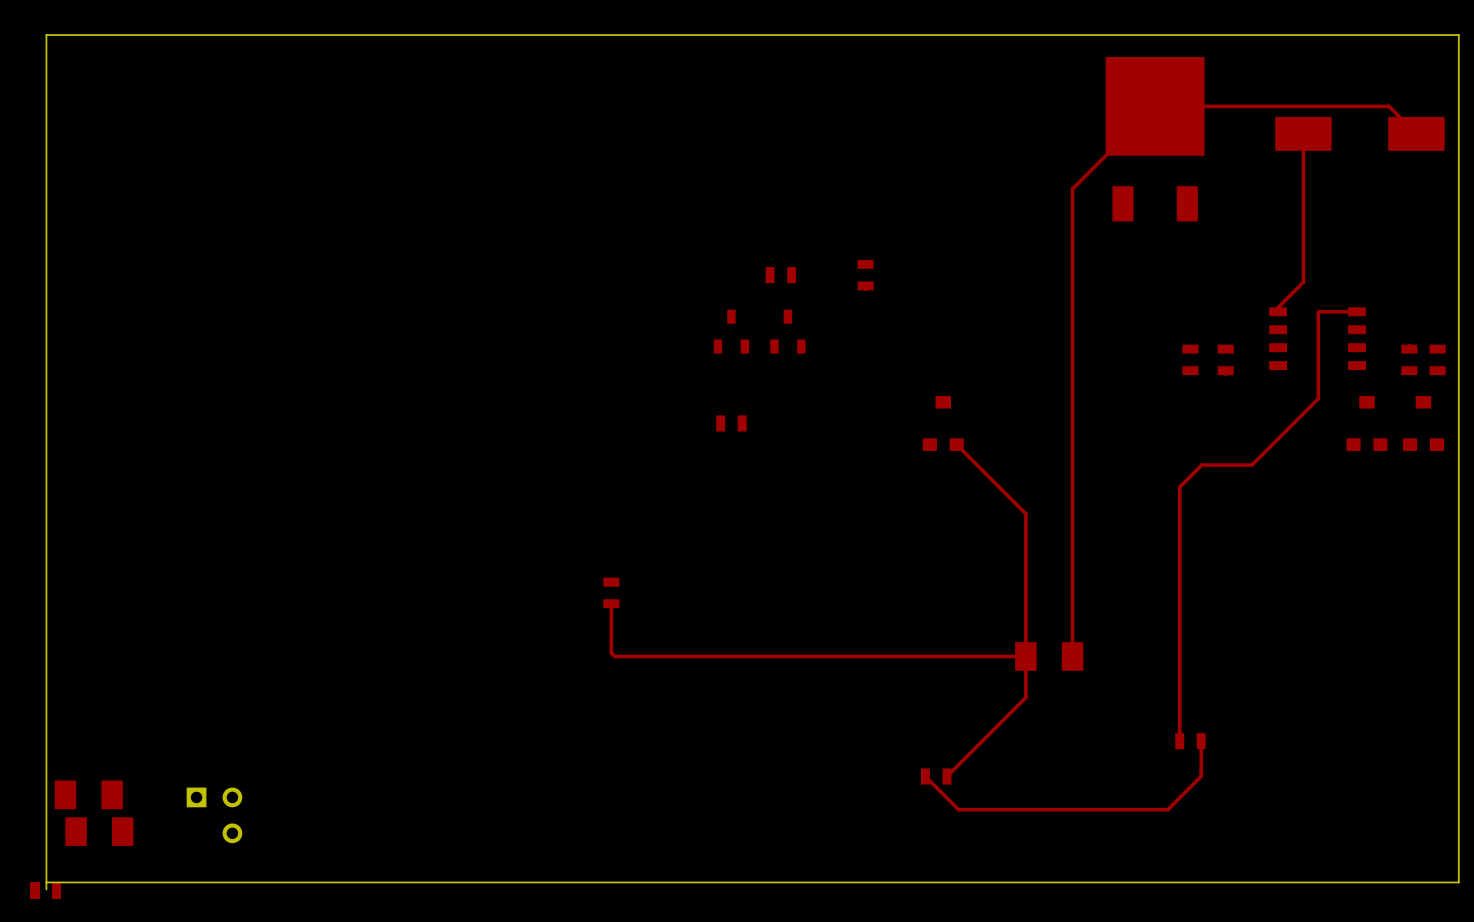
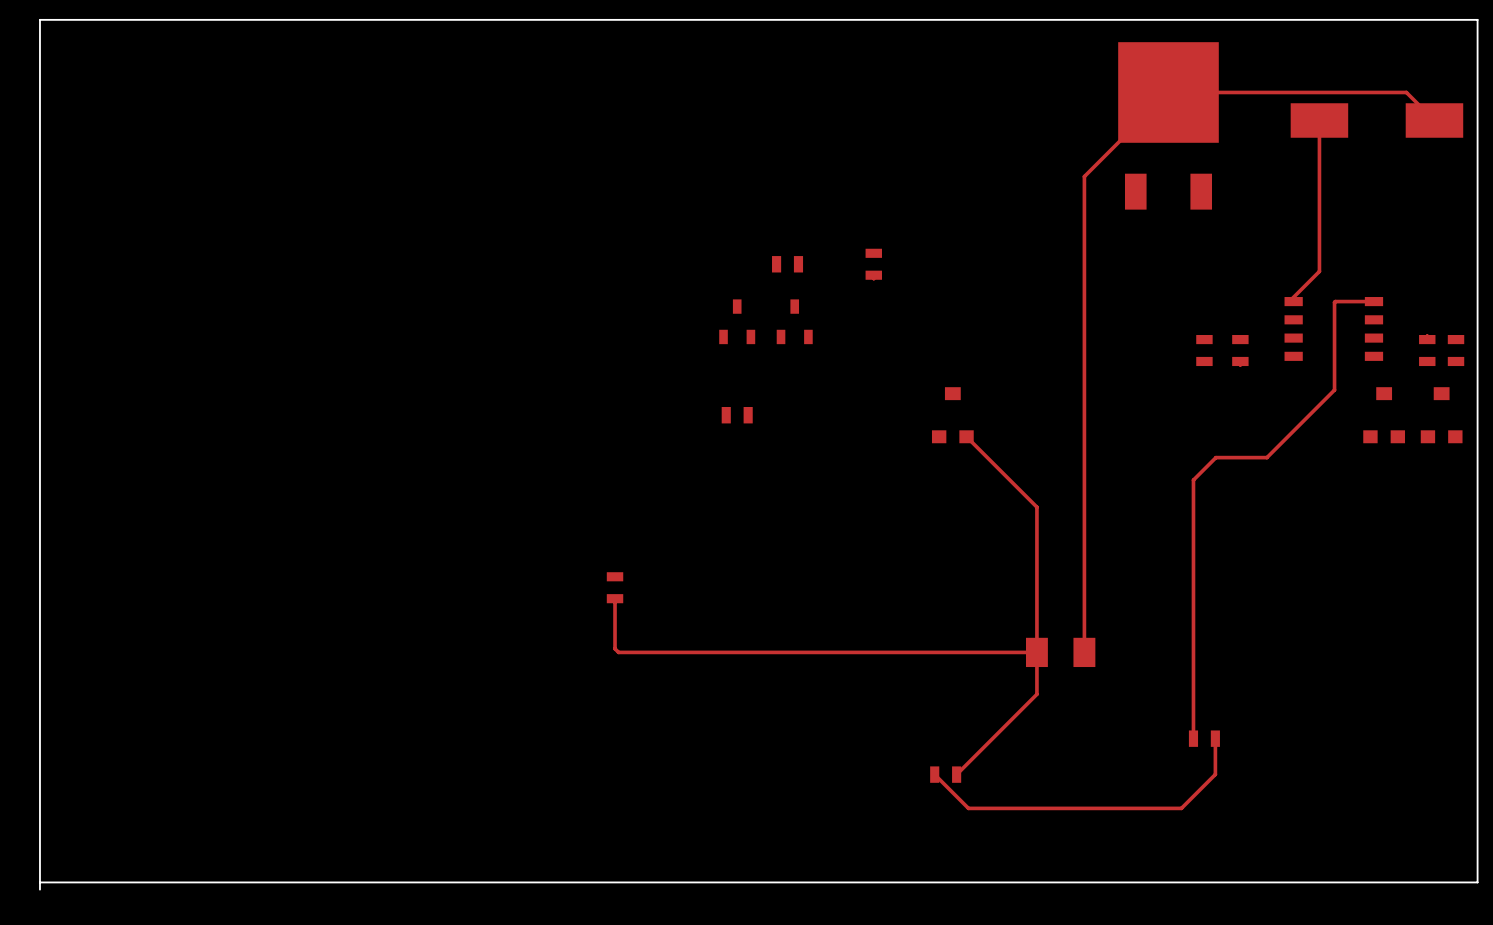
part: (88, 794) -> none
part: (214, 815) -> none
part: (99, 831) -> none
part: (45, 890) -> none

